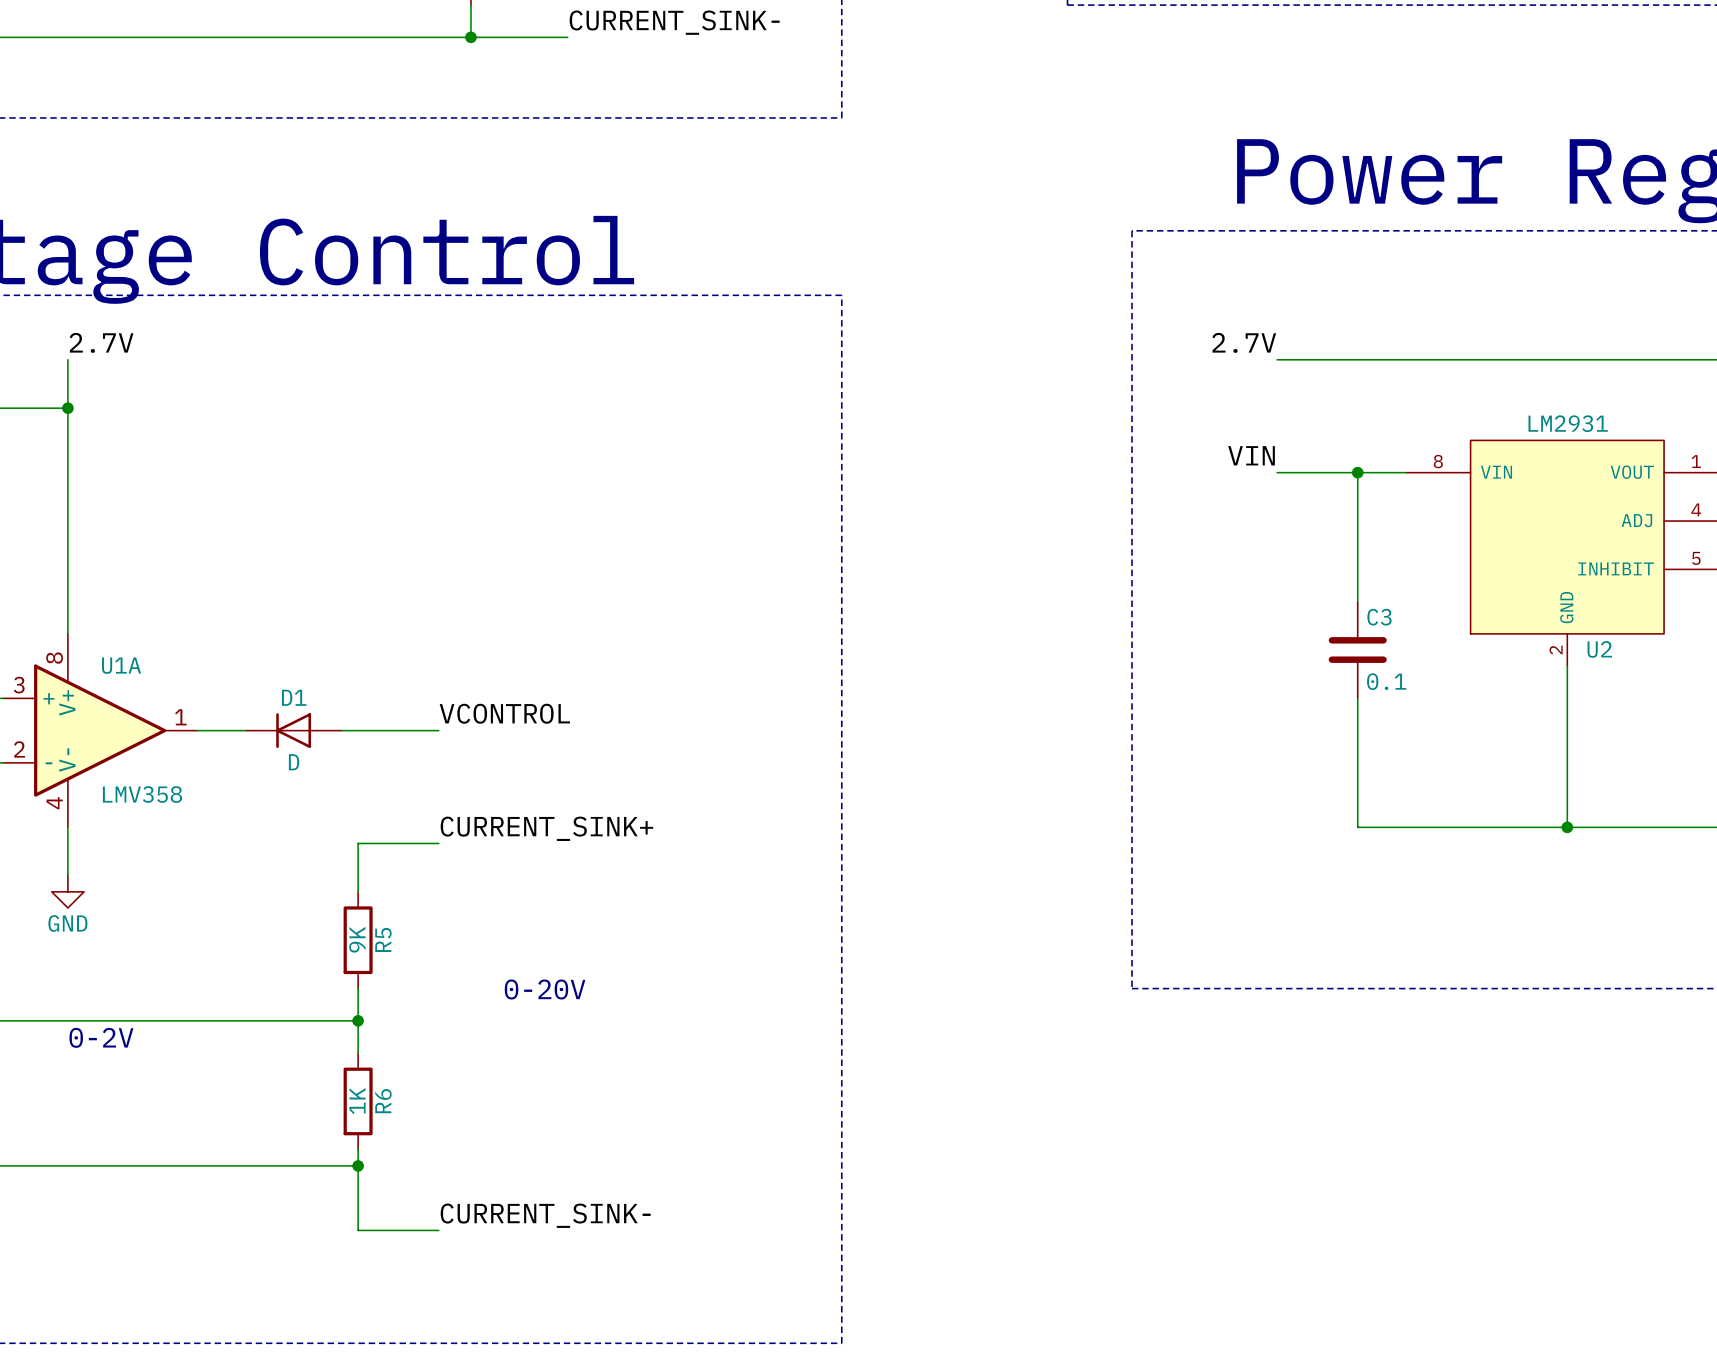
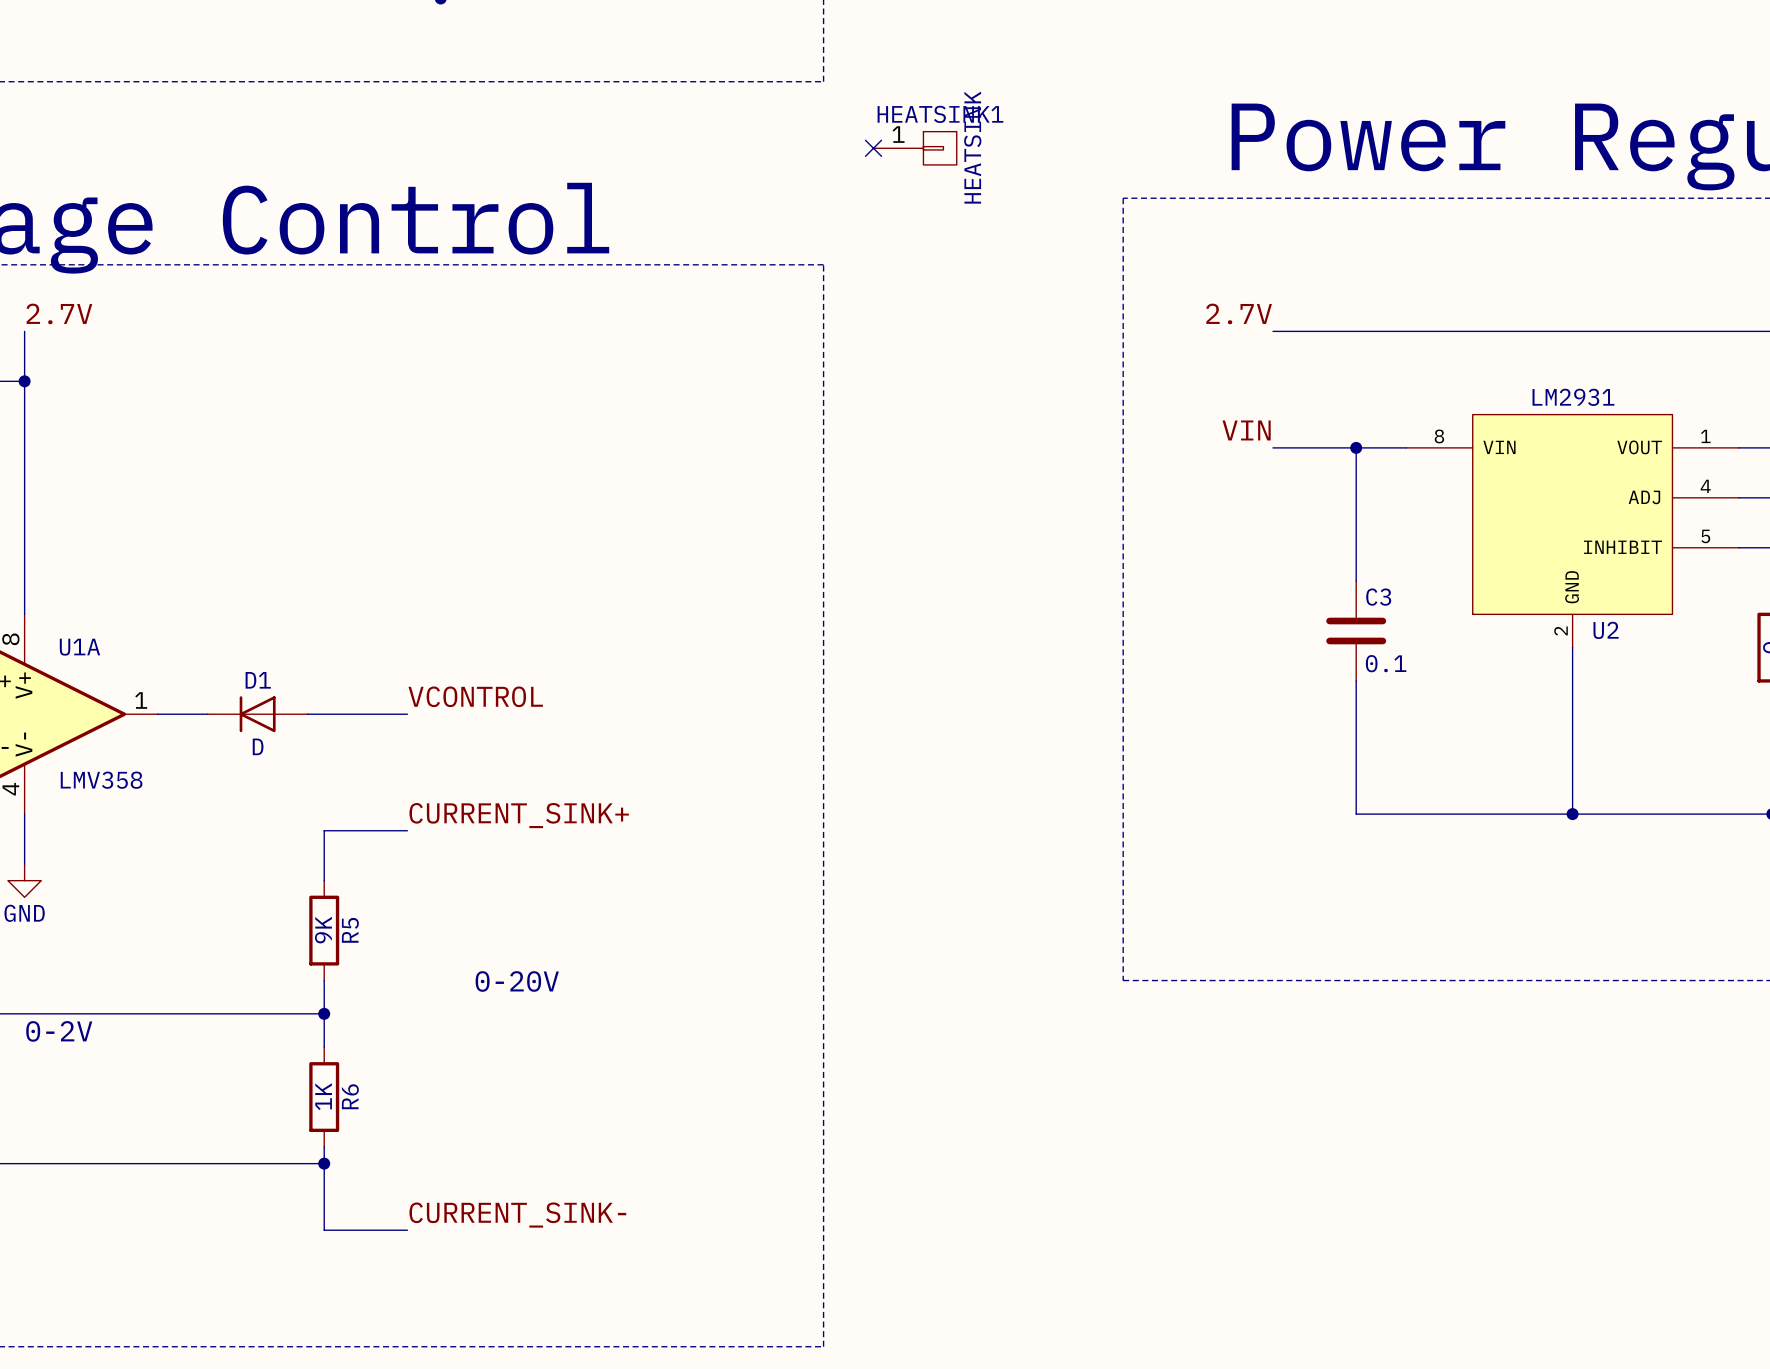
no-connect mark: none -> (873, 148)
HEATSINK1: none -> HEATSINK (915, 148)

